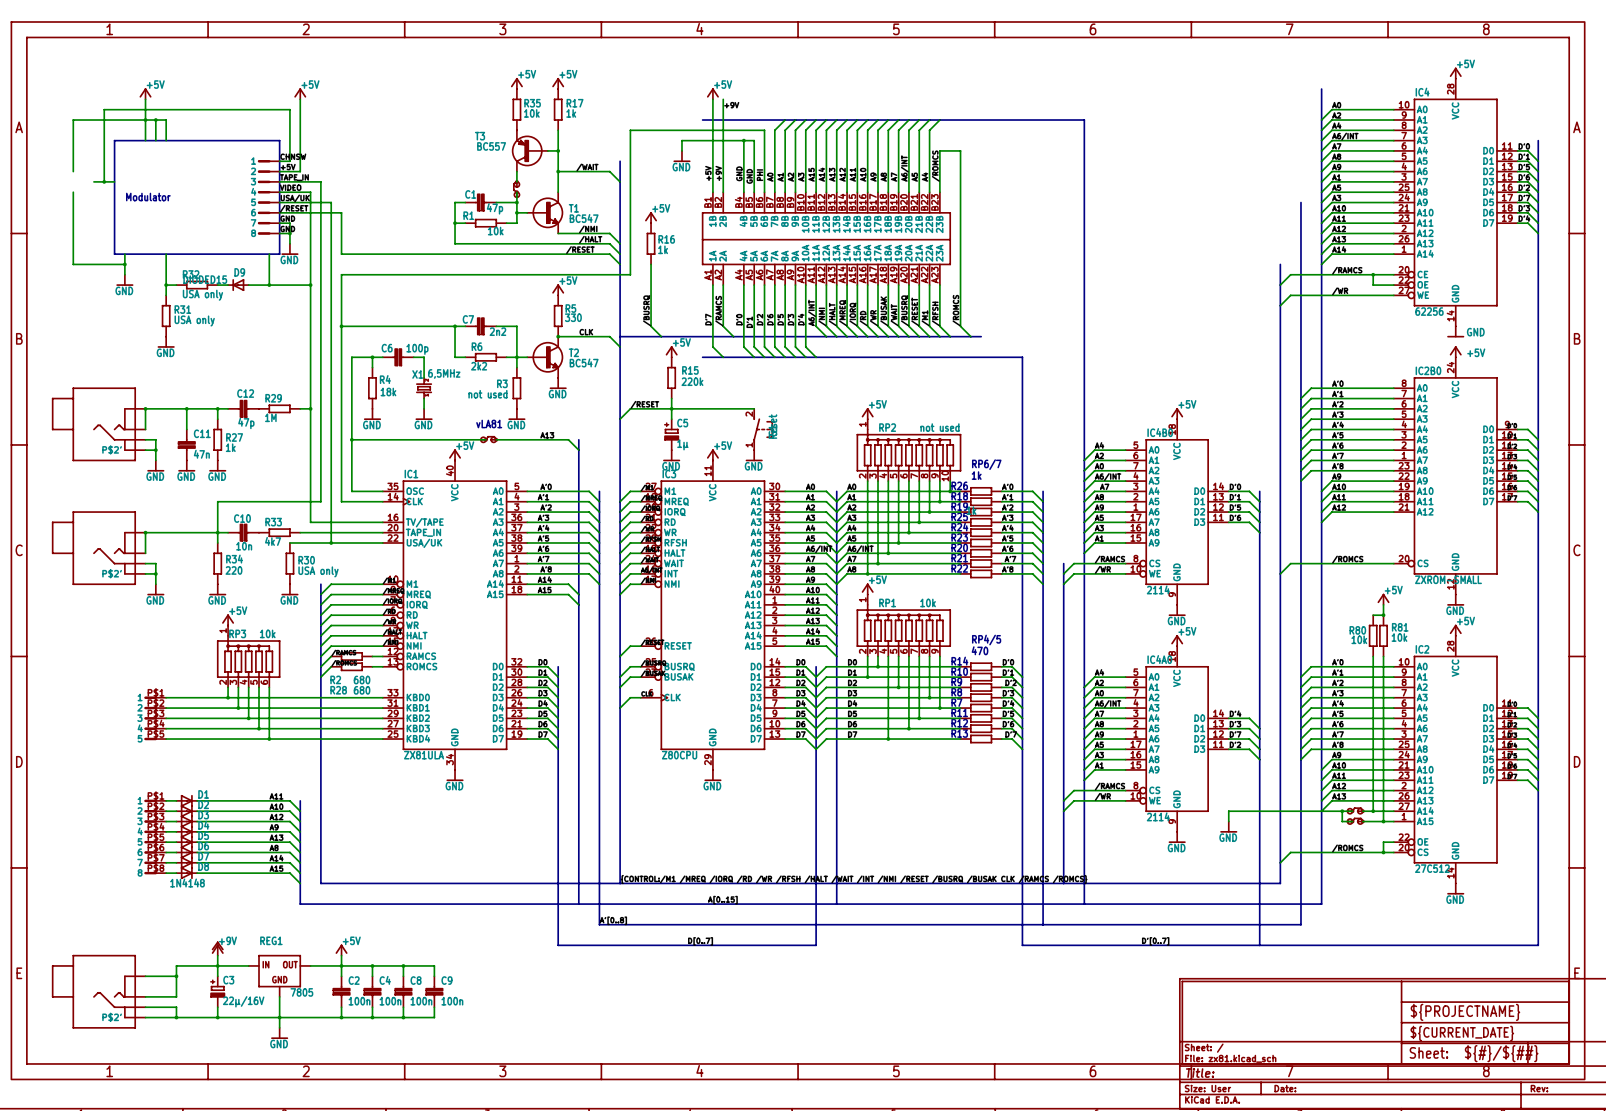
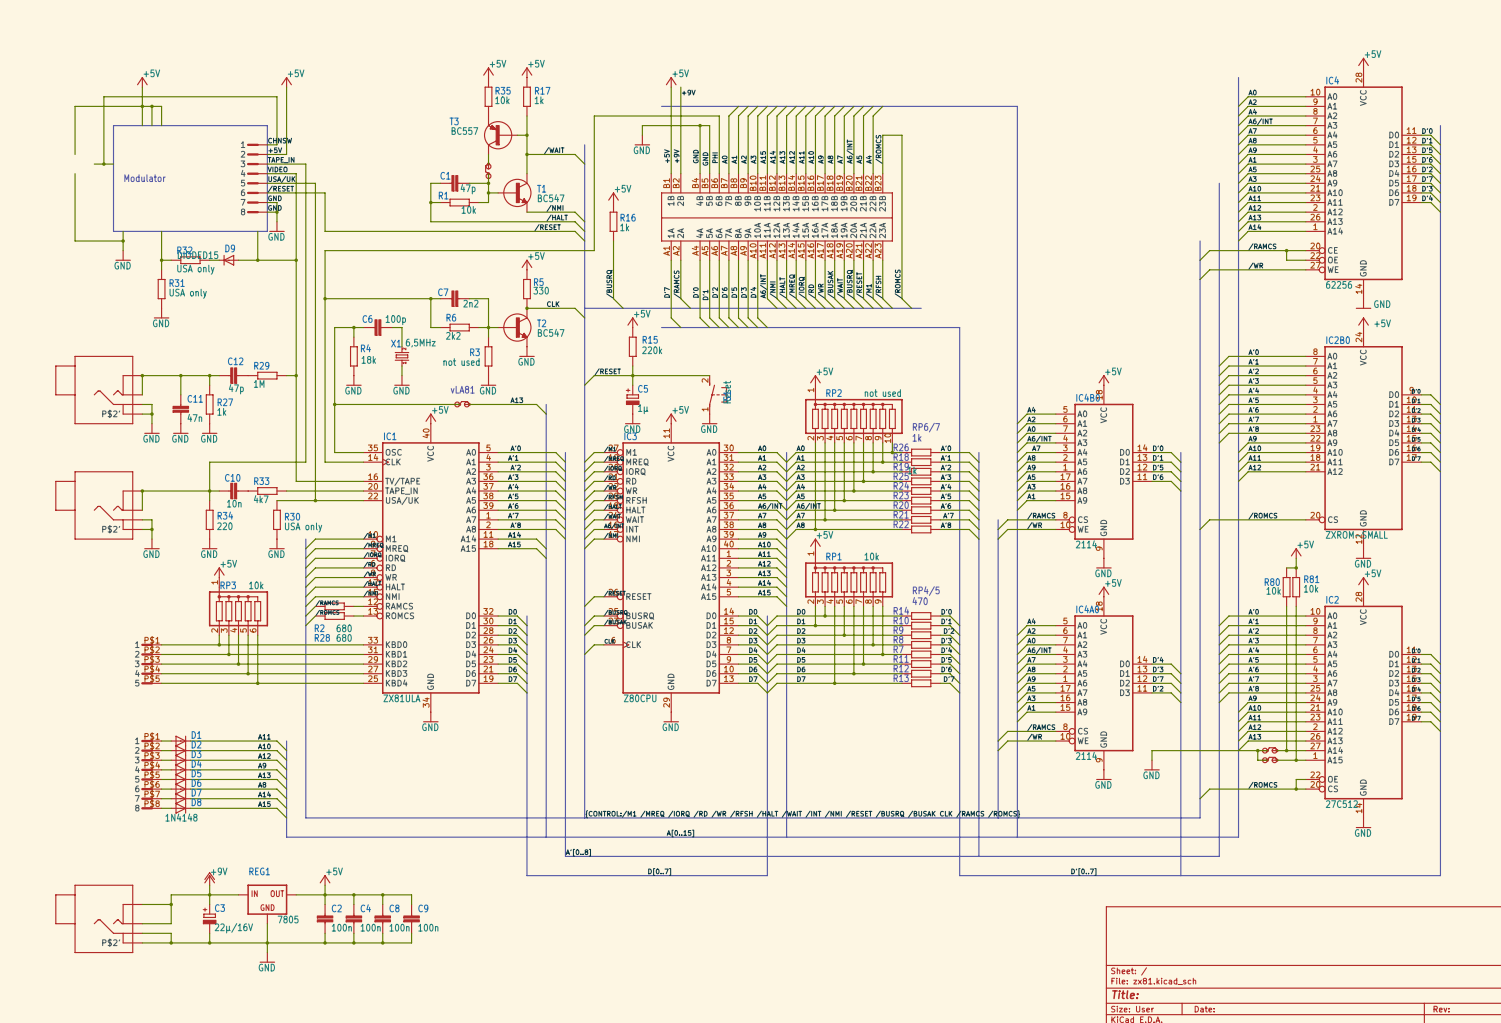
drawing: [11, 22, 1585, 1080] -> none

